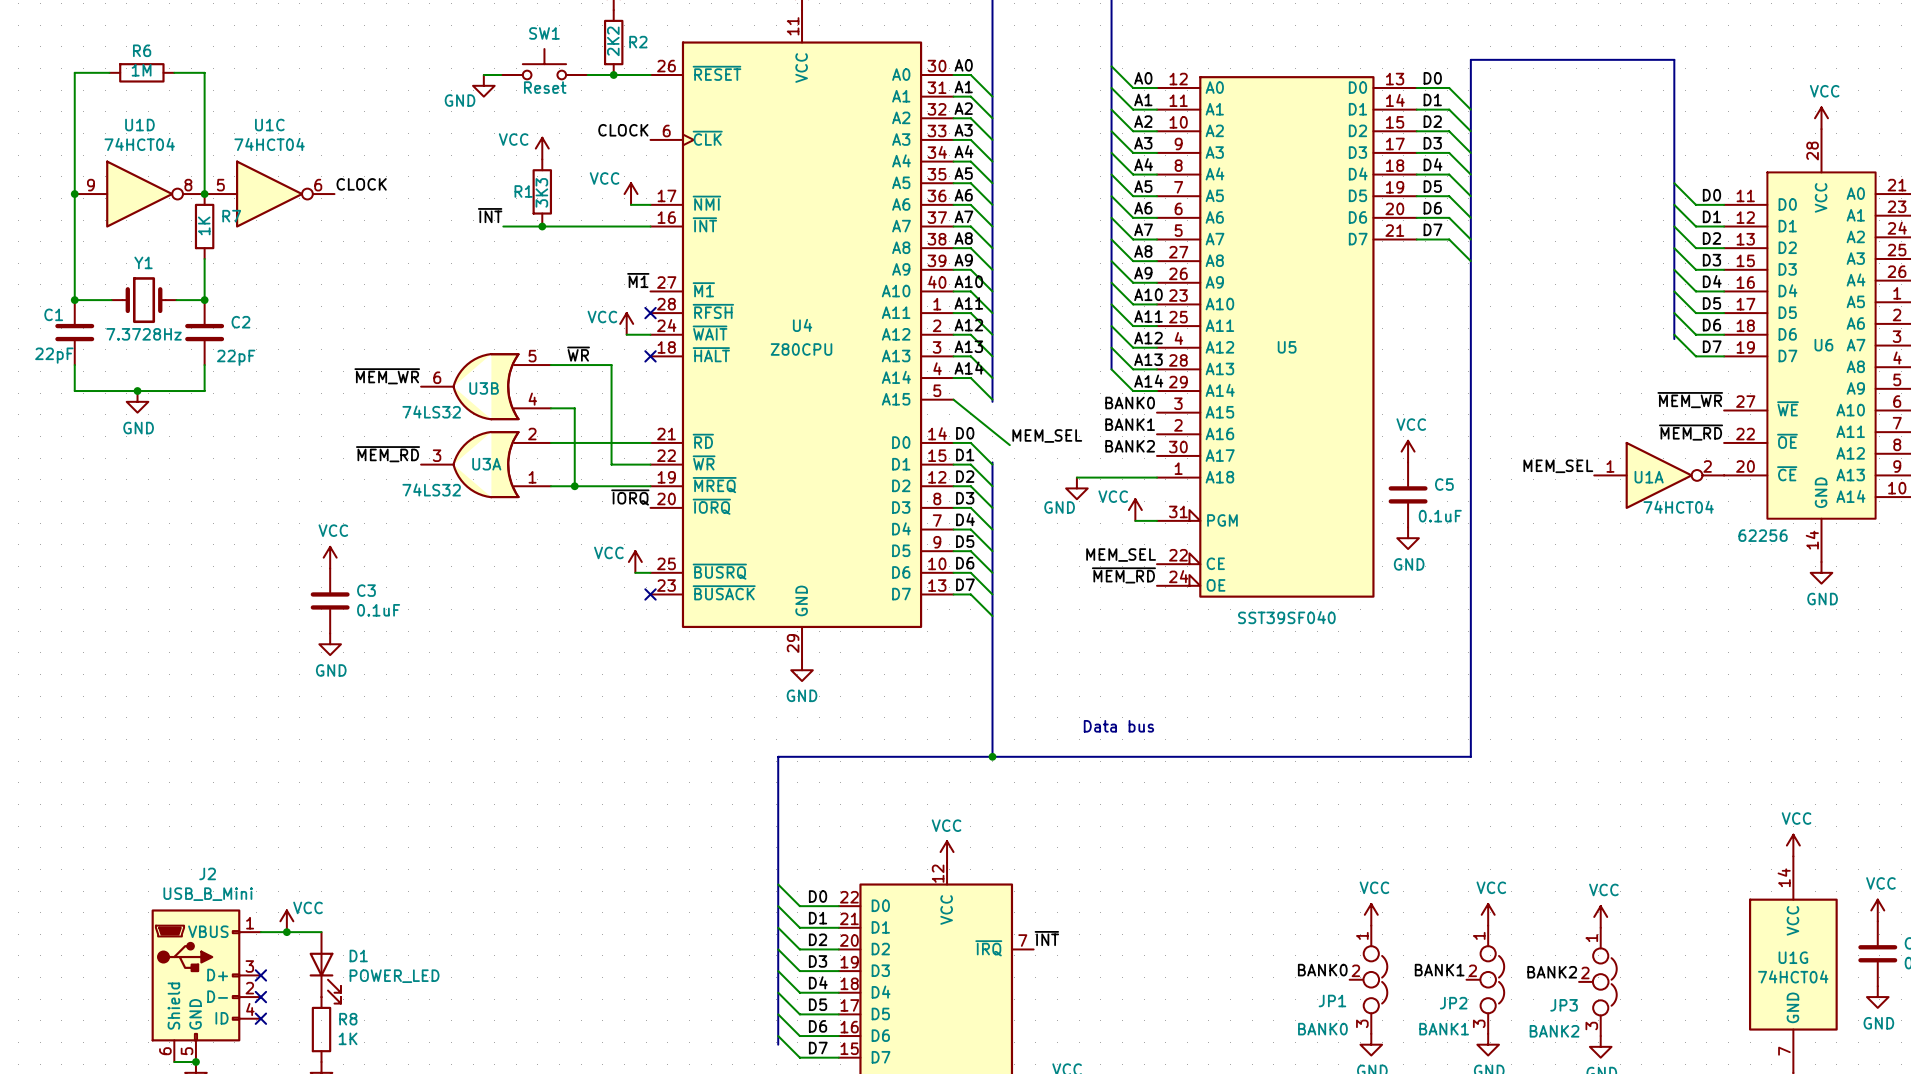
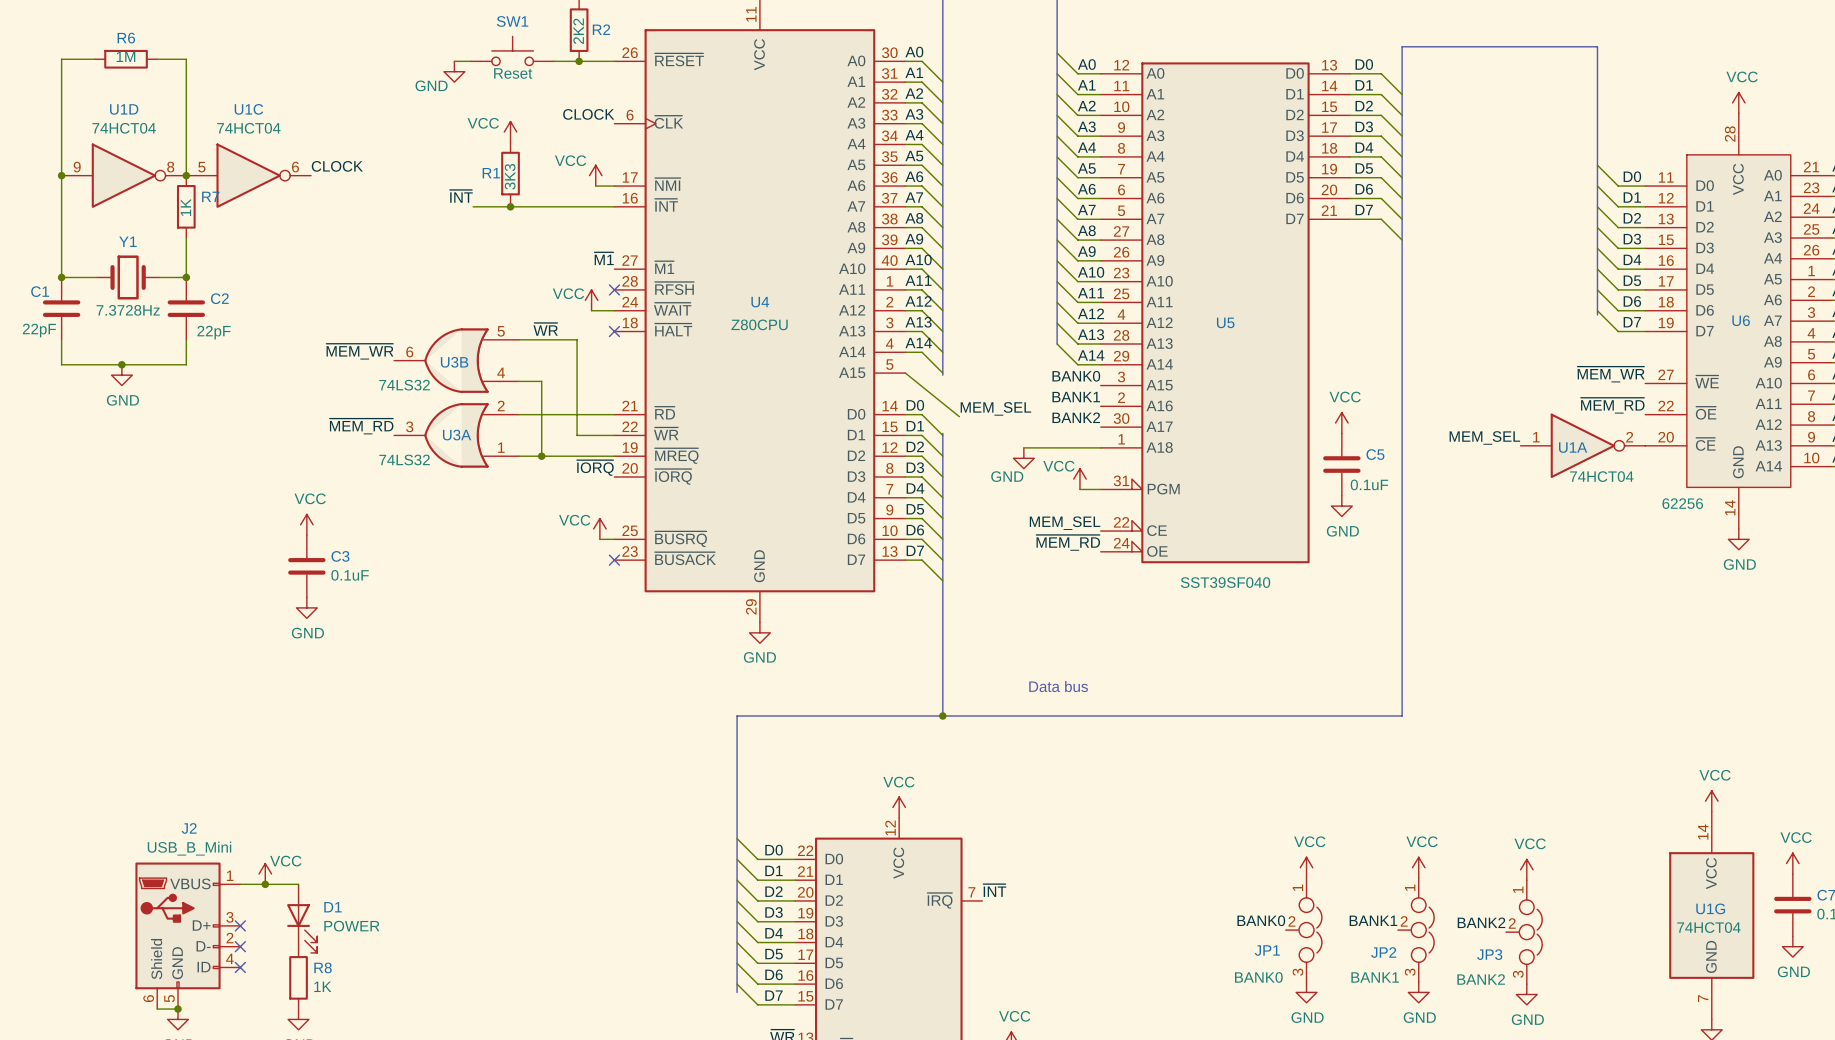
D1 value: POWER_LED (394, 976) -> POWER (351, 926)

